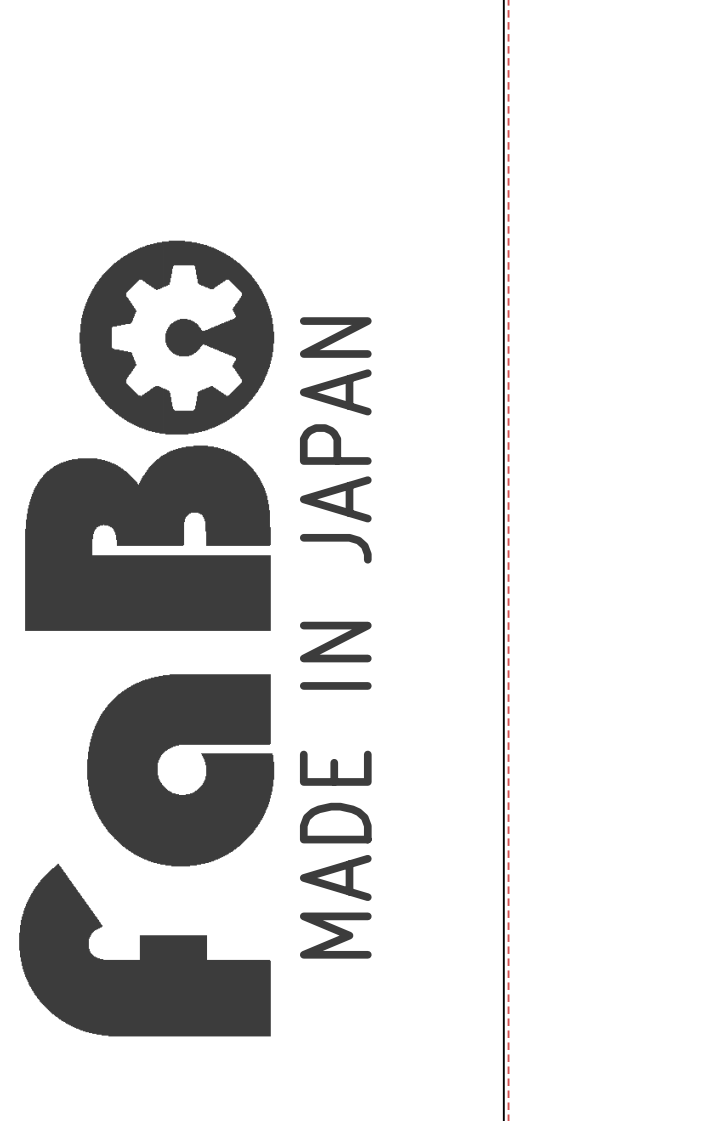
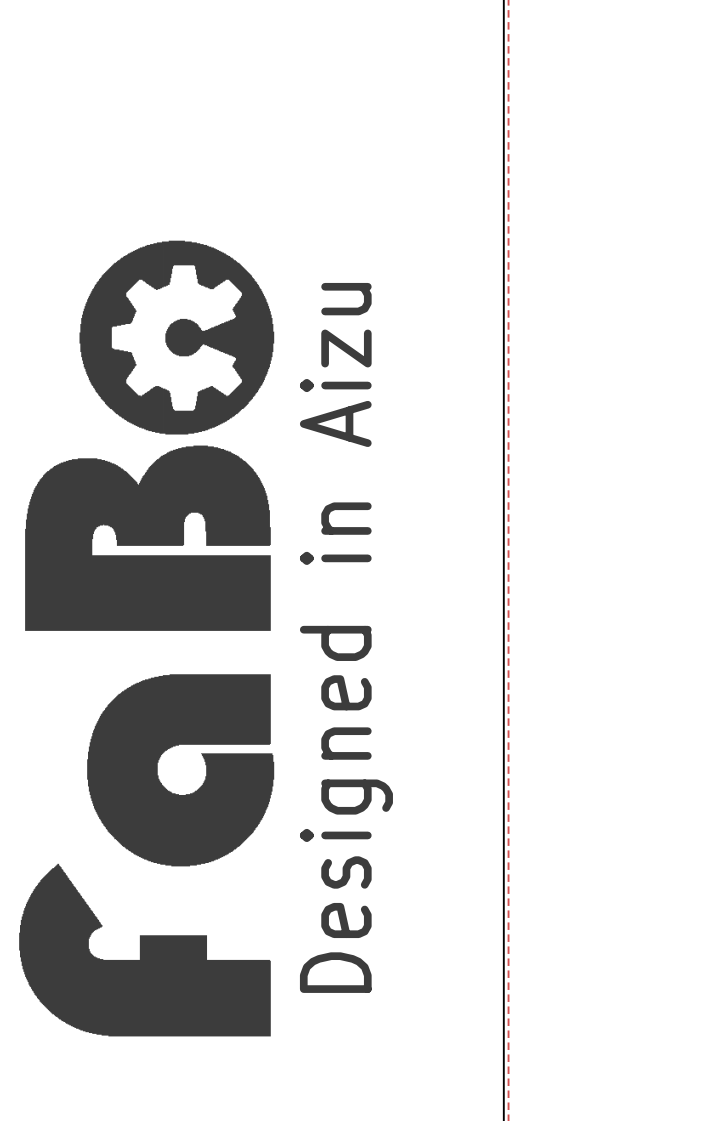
text: MADE IN JAPAN (335, 637) -> Designed in Aizu (346, 637)

